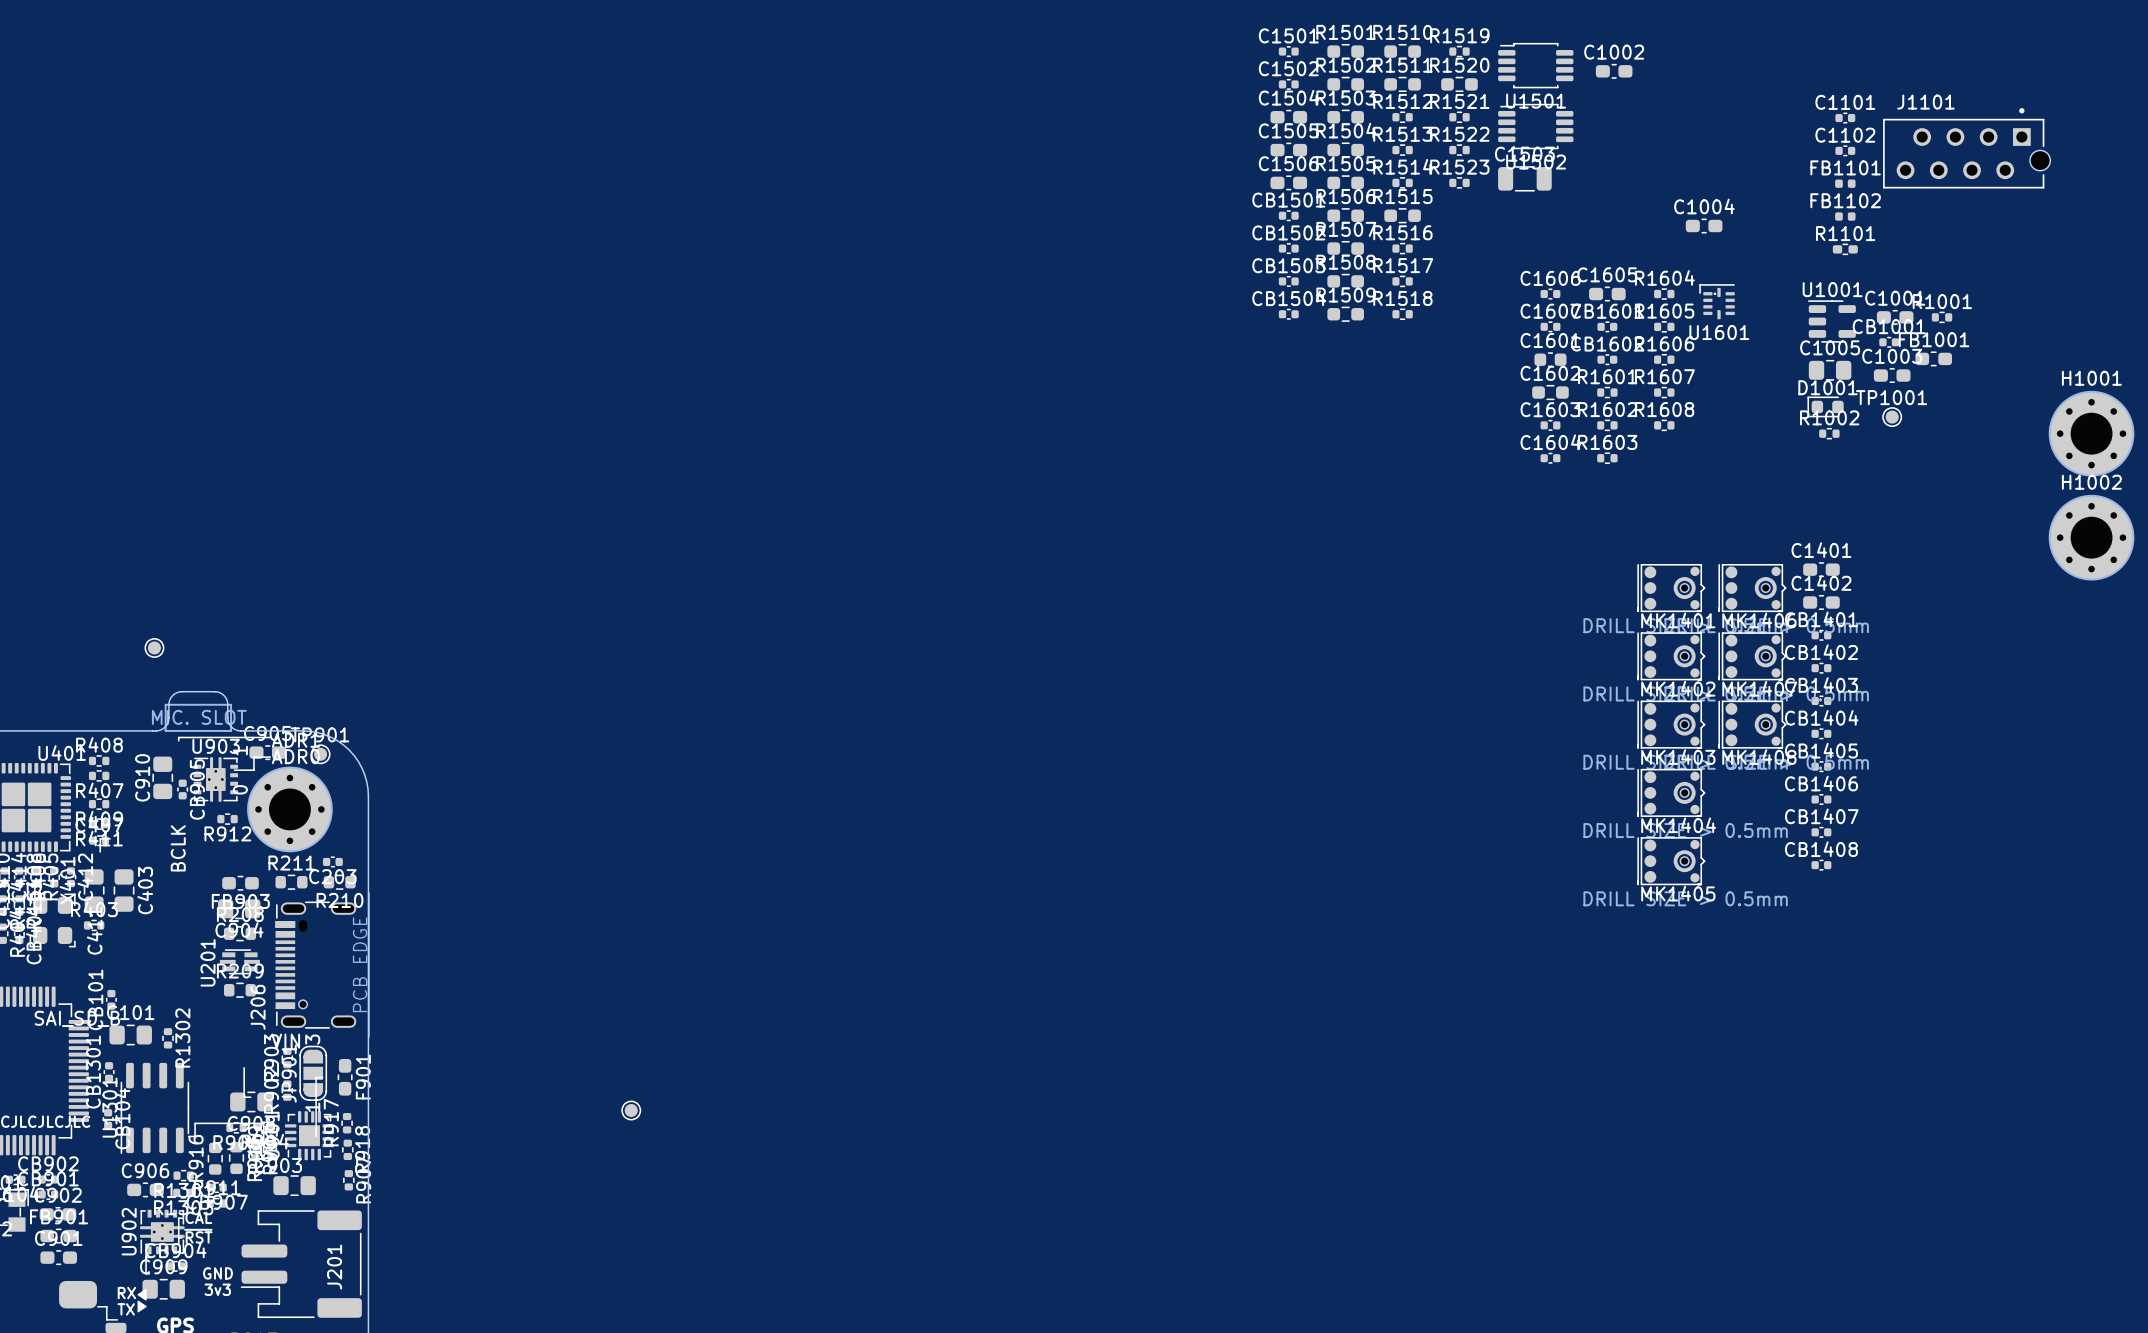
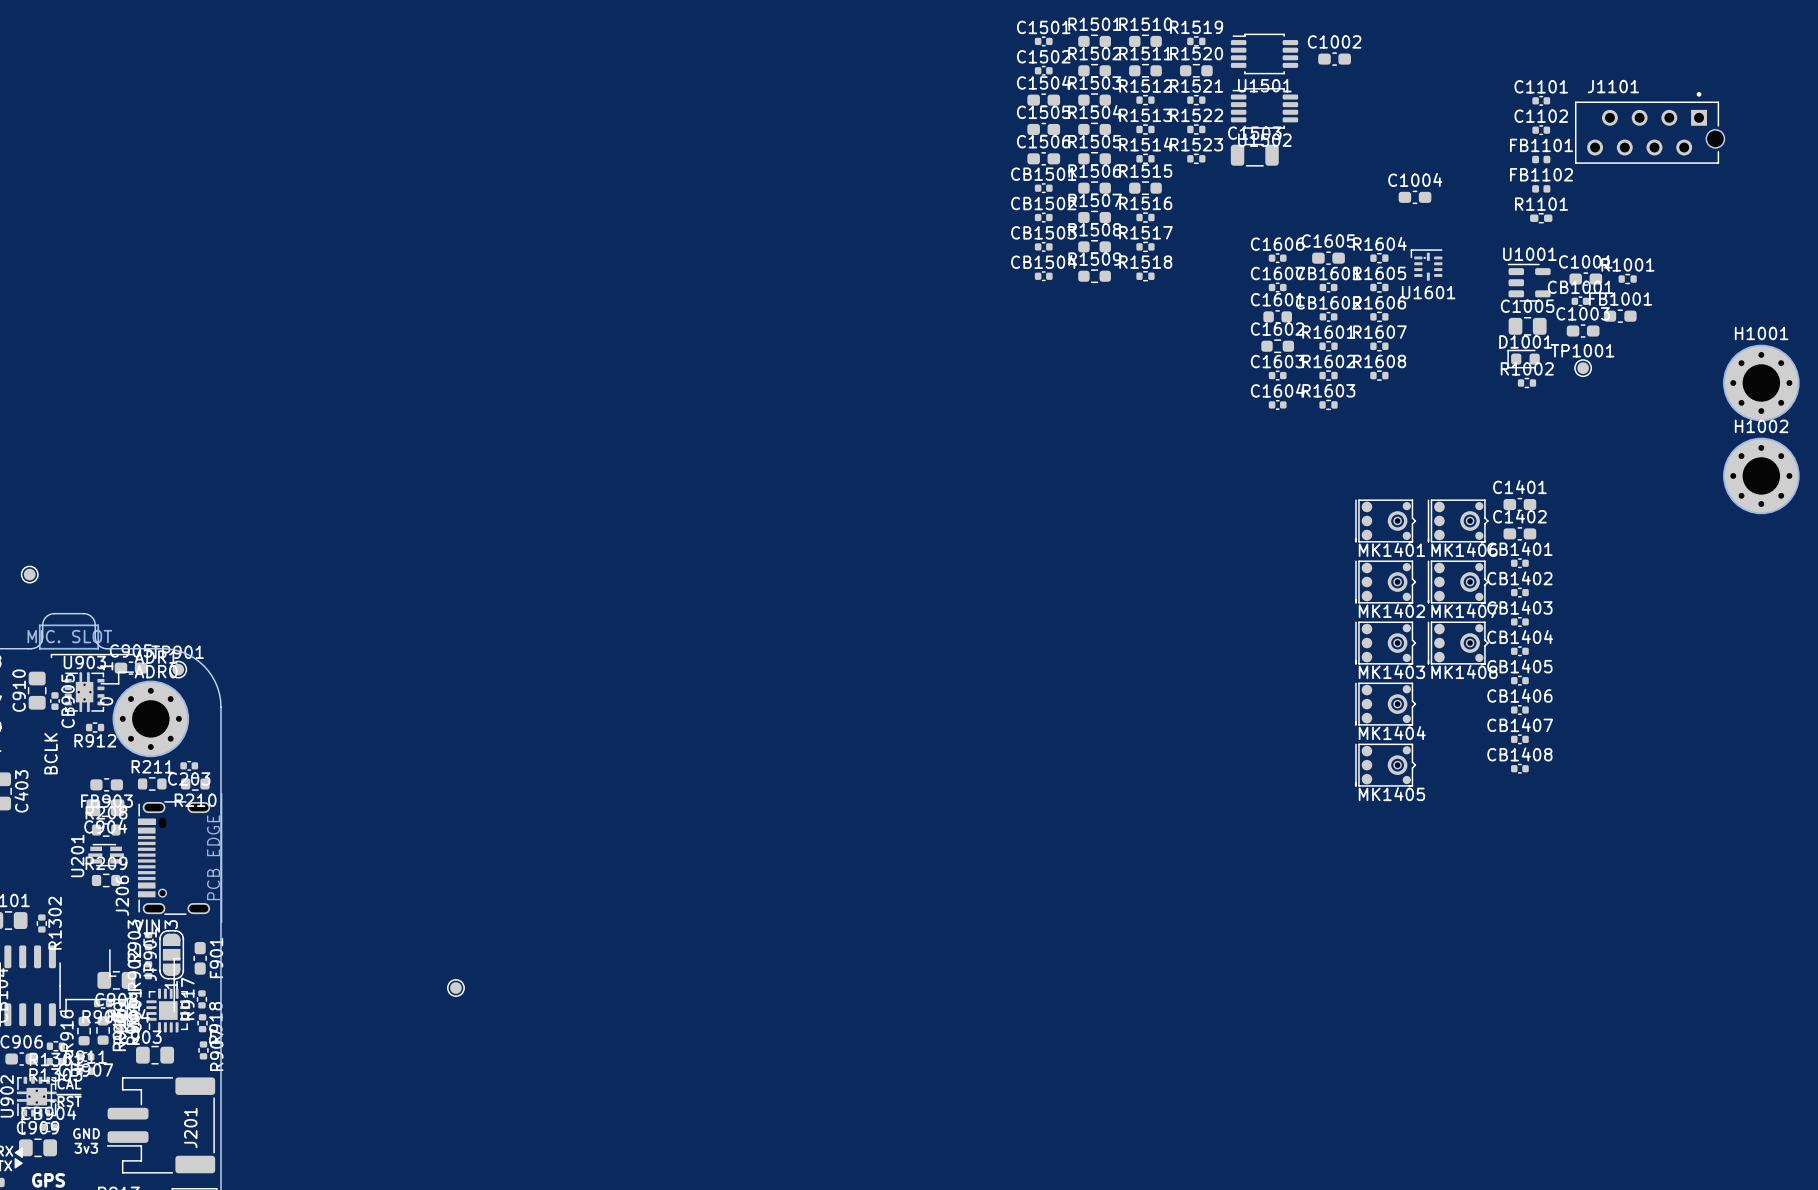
MK1401 footprint: [1637, 563, 1706, 613] -> [1355, 499, 1417, 543]
MK1406 footprint: [1718, 563, 1787, 613] -> [1427, 499, 1489, 543]
MK1402 footprint: [1637, 632, 1706, 681] -> [1355, 560, 1417, 604]
MK1407 footprint: [1718, 632, 1787, 681] -> [1427, 560, 1489, 604]
MK1403 footprint: [1637, 700, 1706, 749] -> [1355, 621, 1417, 665]
MK1408 footprint: [1718, 700, 1787, 749] -> [1427, 621, 1489, 665]
MK1404 footprint: [1637, 768, 1706, 817] -> [1355, 682, 1417, 726]
MK1405 footprint: [1637, 837, 1706, 886] -> [1355, 743, 1417, 787]

